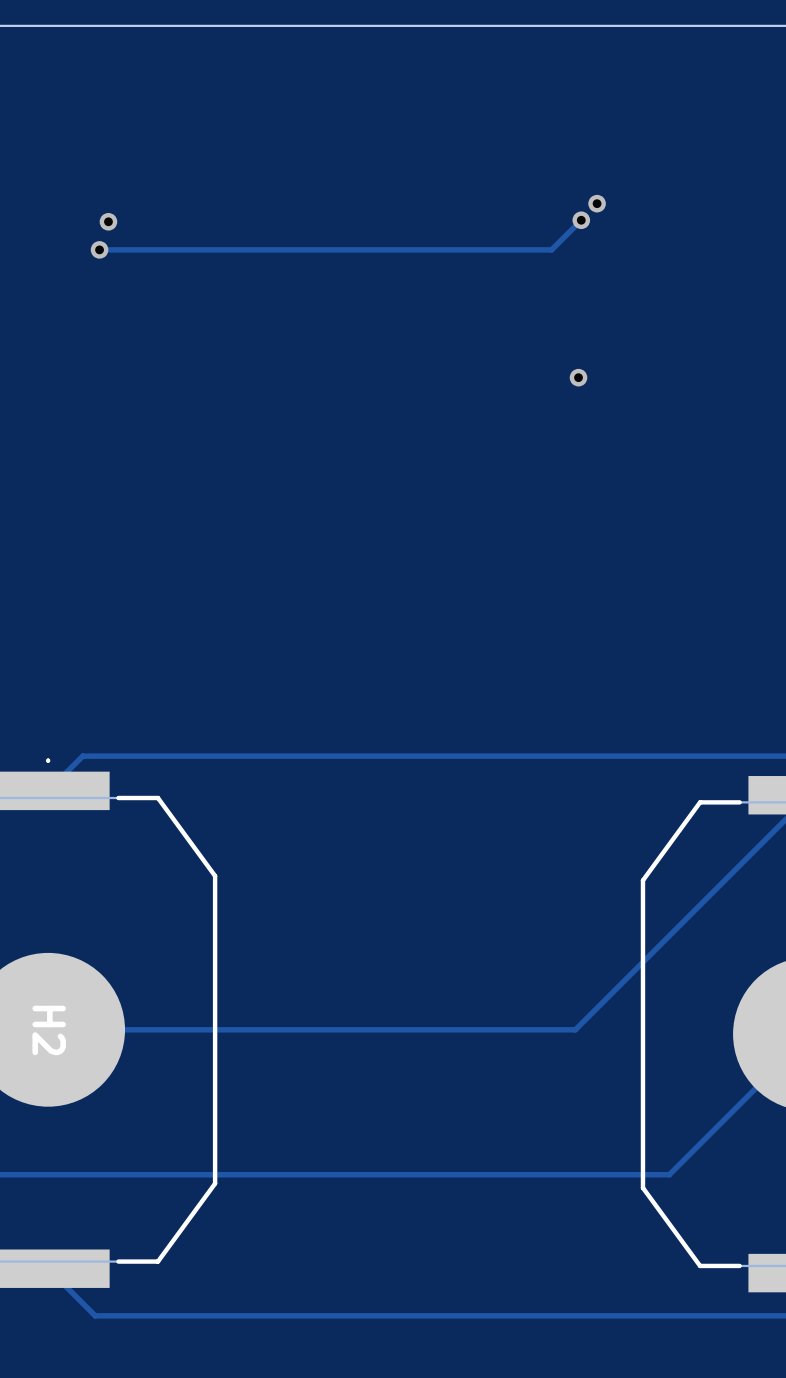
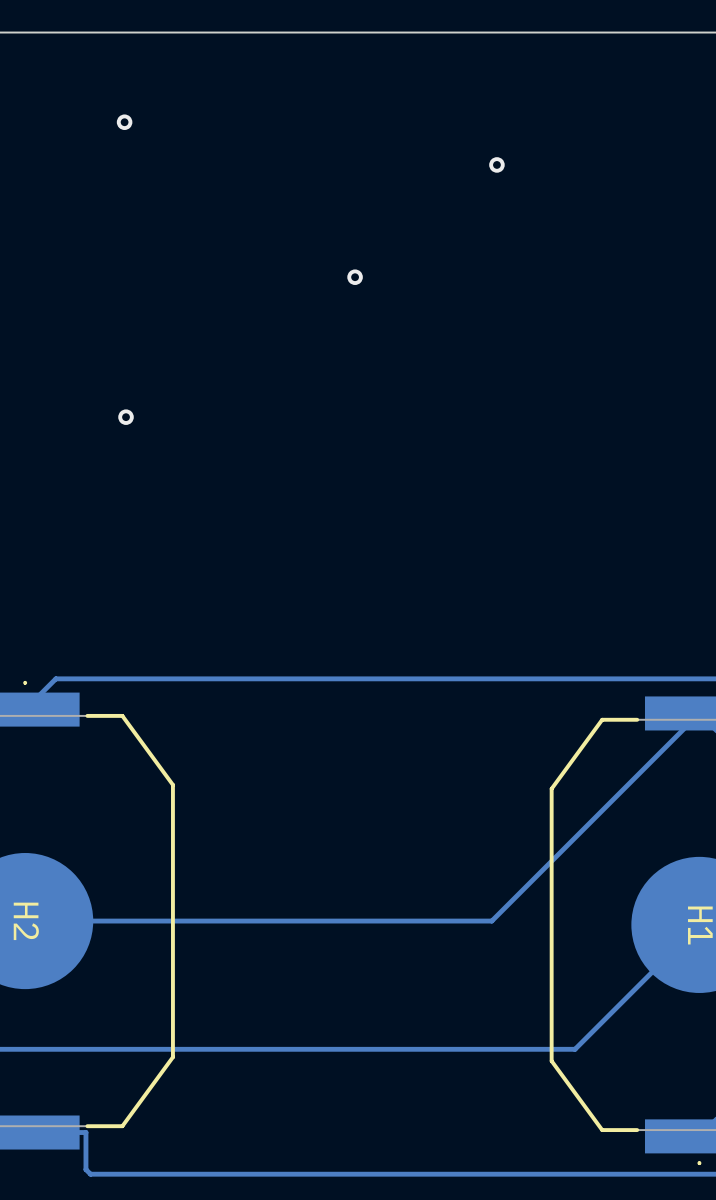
via: none -> (124, 122)
via: none -> (496, 164)
via: (597, 203) -> none
track: (581, 220) (551, 249) (99, 249) -> none
via: (581, 220) -> none
via: (108, 221) -> none
via: (99, 249) -> none
via: none -> (355, 277)
via: (578, 377) -> none
via: none -> (126, 417)
track: (48, 1268) (95, 1315) (122, 1315) -> (25, 1132) (85, 1132) (85, 1169) (90, 1174)

